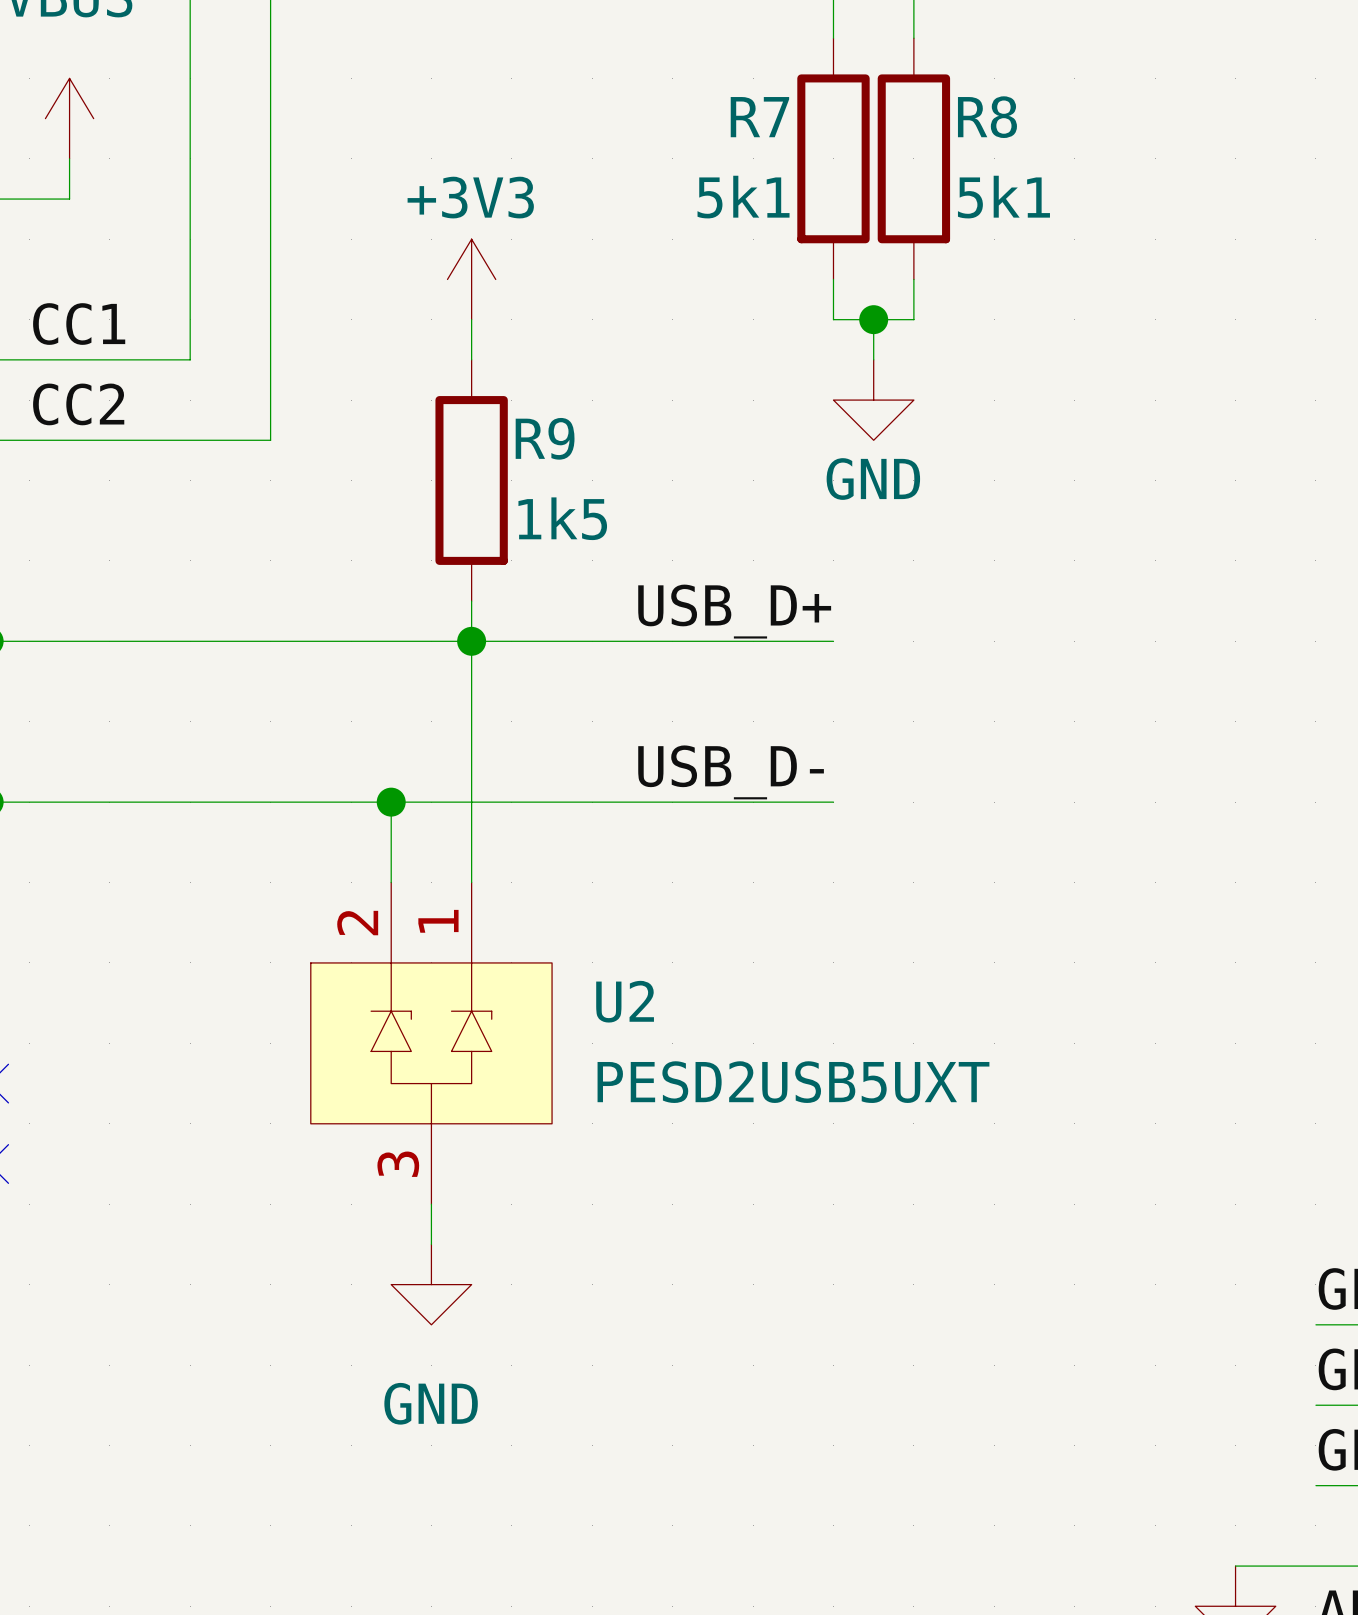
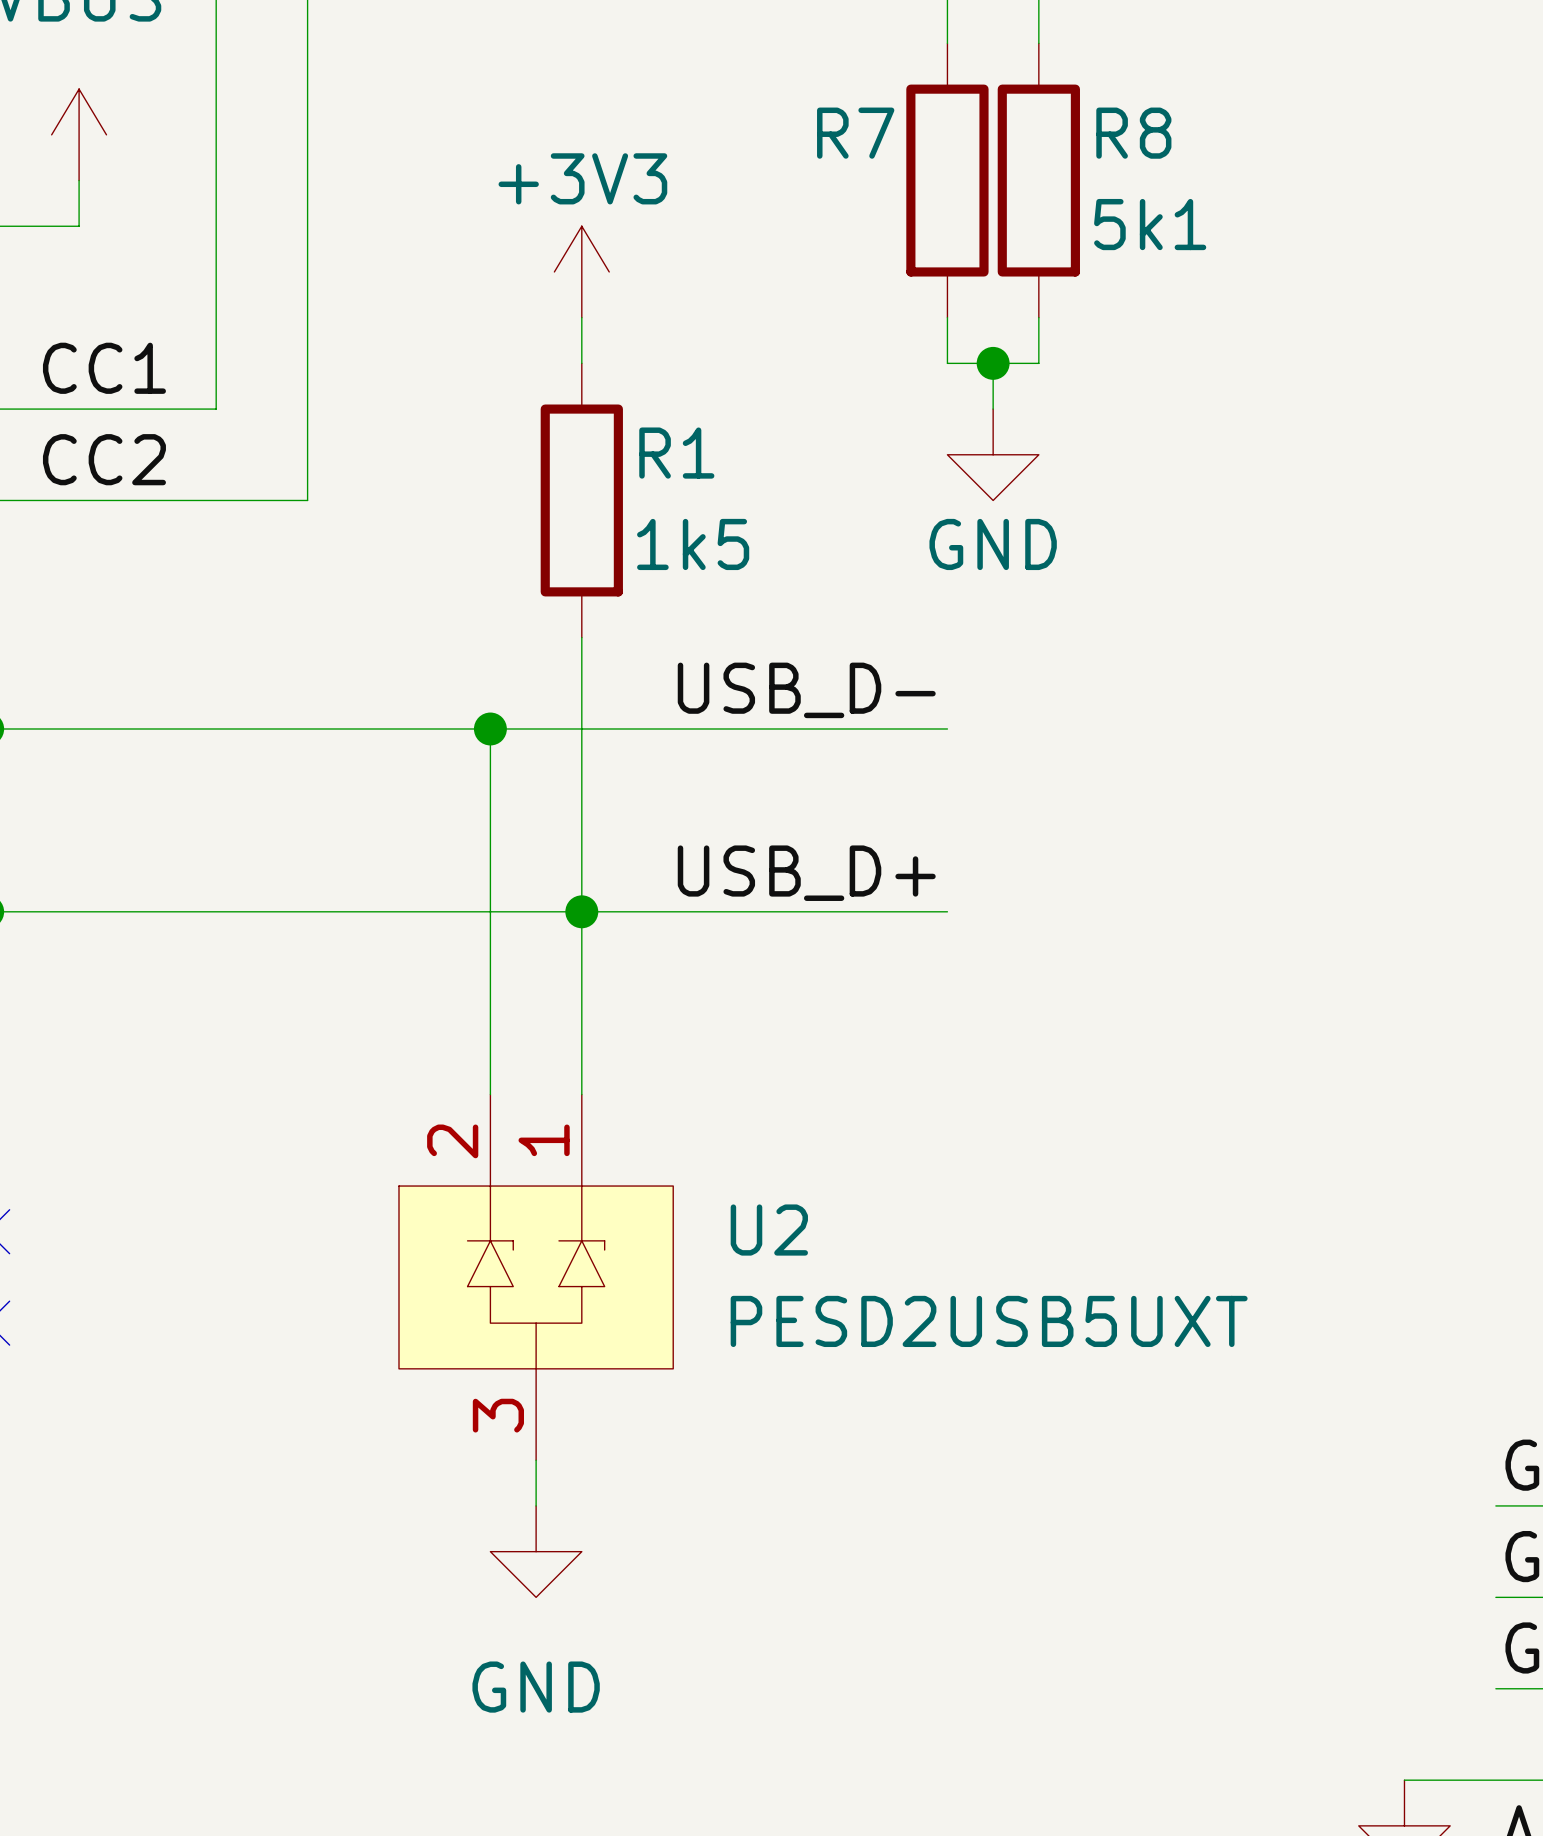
R7 value: 5k1 (743, 197) -> none
power symbol position: +3V3 (471, 279) -> +3V3 (581, 271)
wire: (471, 319) (471, 359) -> (581, 317) (581, 363)
R1: none -> 1k5 (581, 500)
R9: 1k5 (471, 480) -> none
wire: none -> (581, 637) (581, 1094)
wire: (471, 601) (471, 882) -> none
label: USB_D+ (734, 611) -> USB_D- (806, 690)
wire: none -> (490, 728) (490, 1094)
junction position: (471, 641) -> (490, 728)
label: USB_D- (731, 772) -> USB_D+ (806, 873)
wire: (391, 802) (391, 882) -> none
junction: (391, 802) -> none
junction: none -> (581, 911)
U2 position: (431, 1043) -> (536, 1277)
wire: (431, 1204) (431, 1244) -> (536, 1460) (536, 1505)
power symbol position: GND (431, 1284) -> GND (536, 1551)

